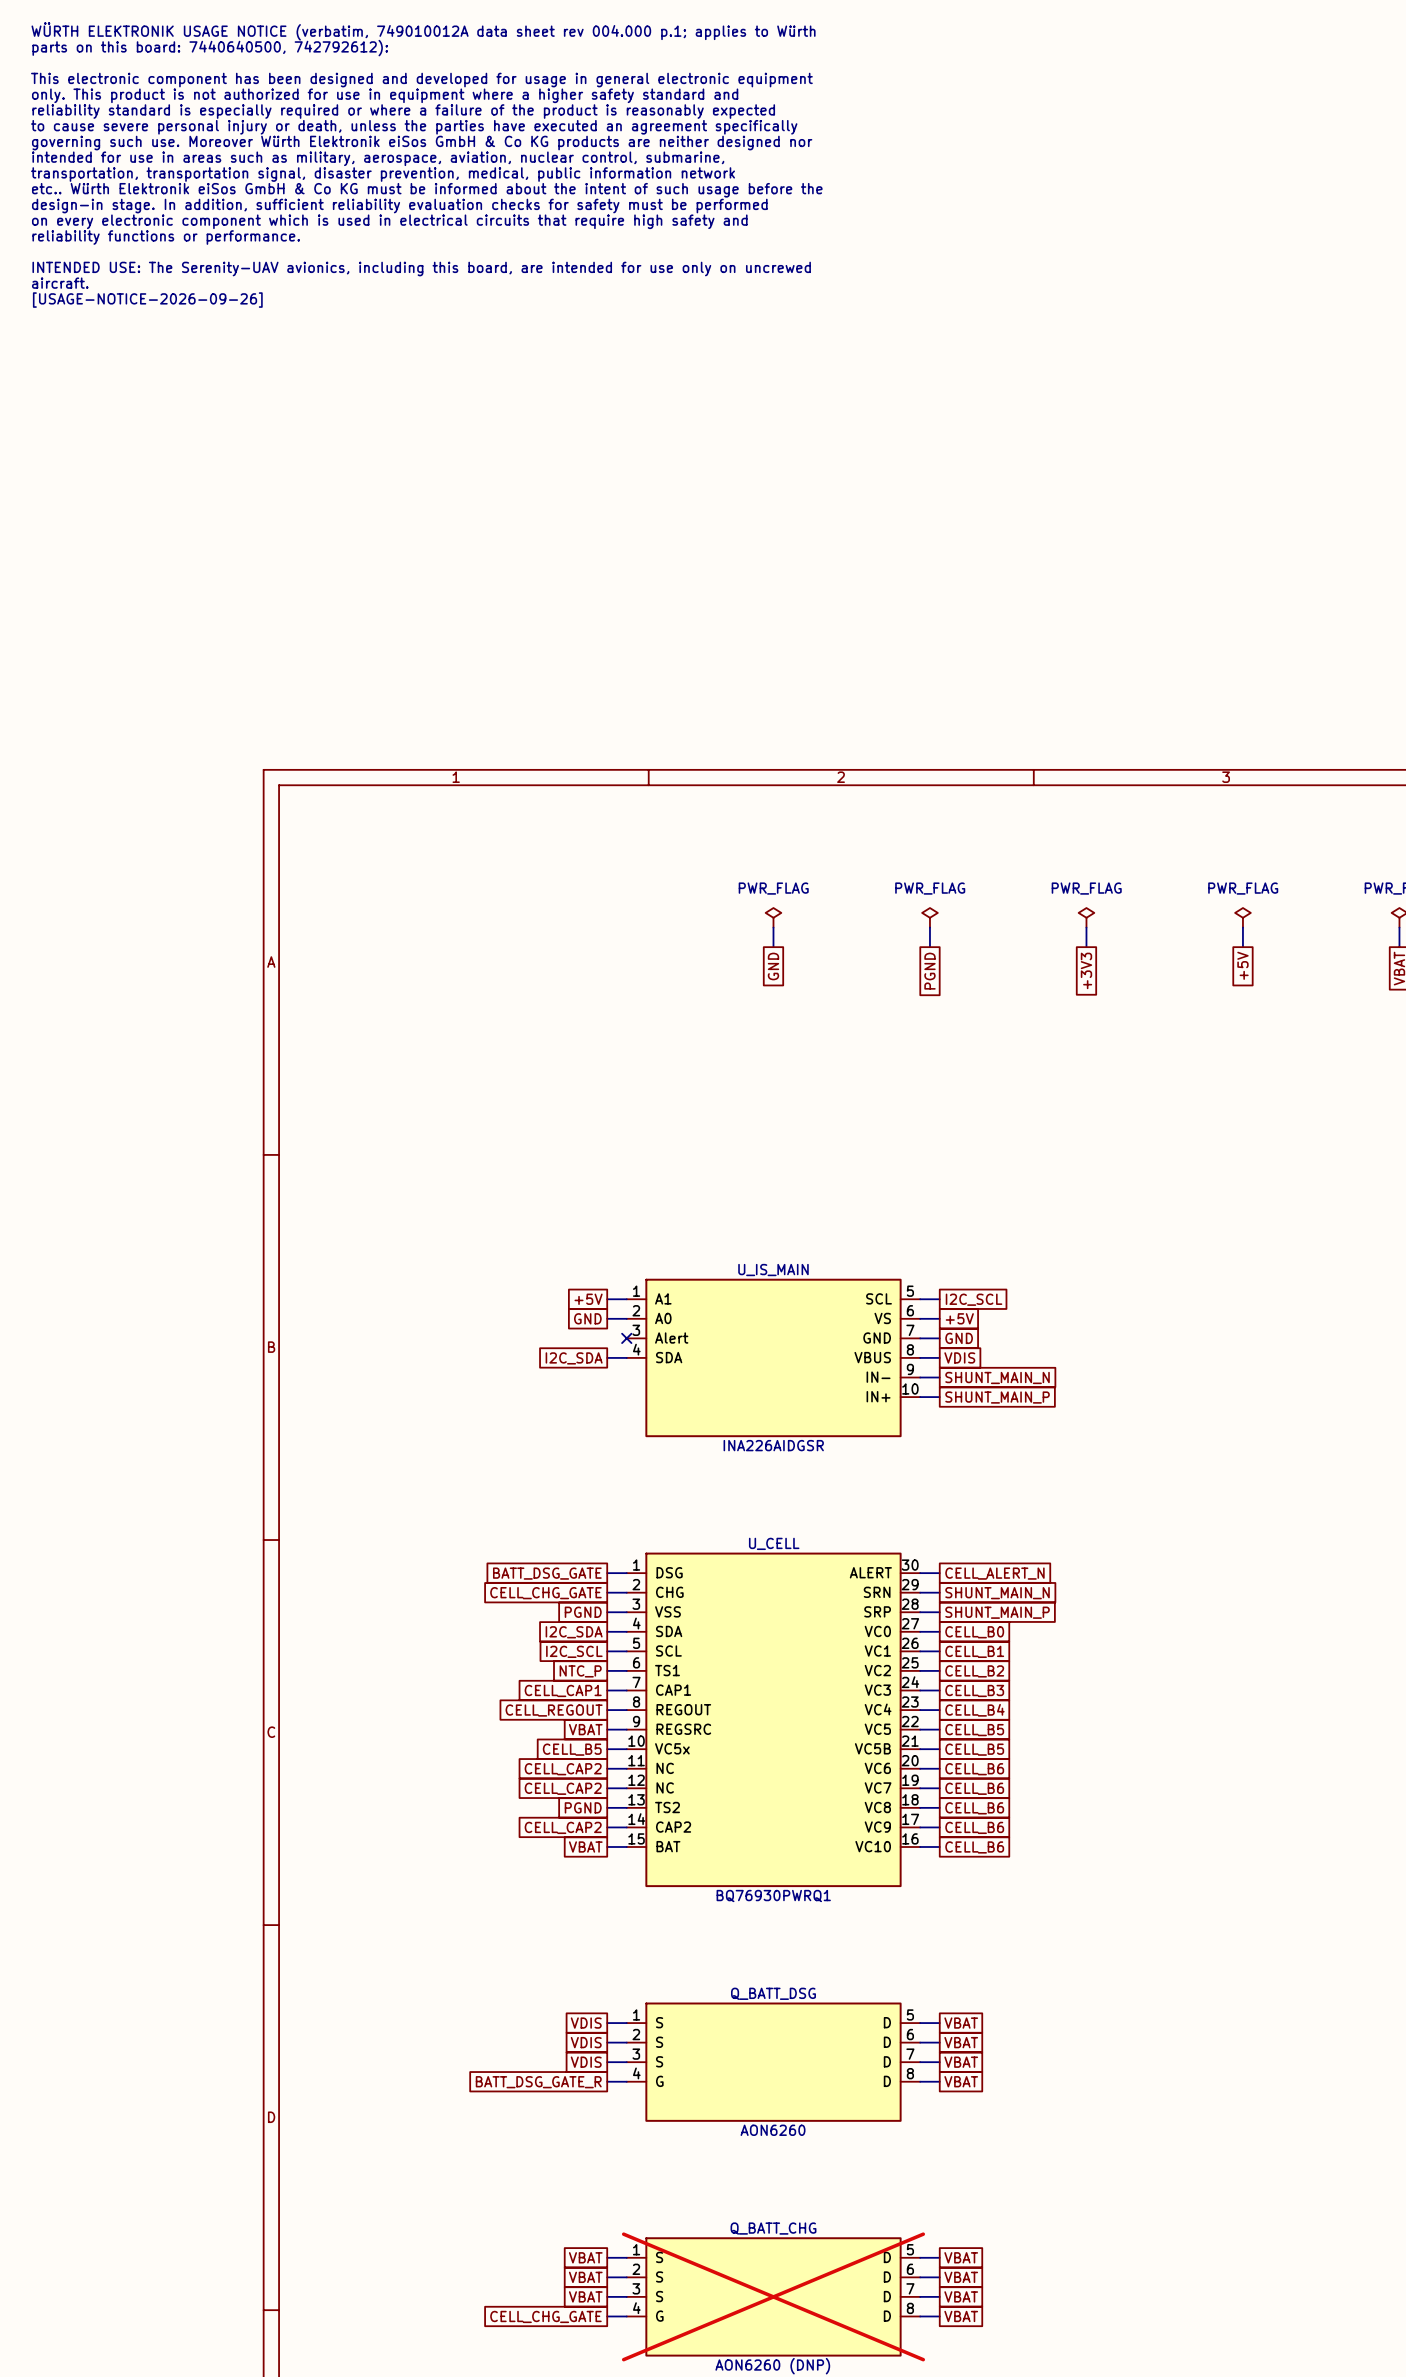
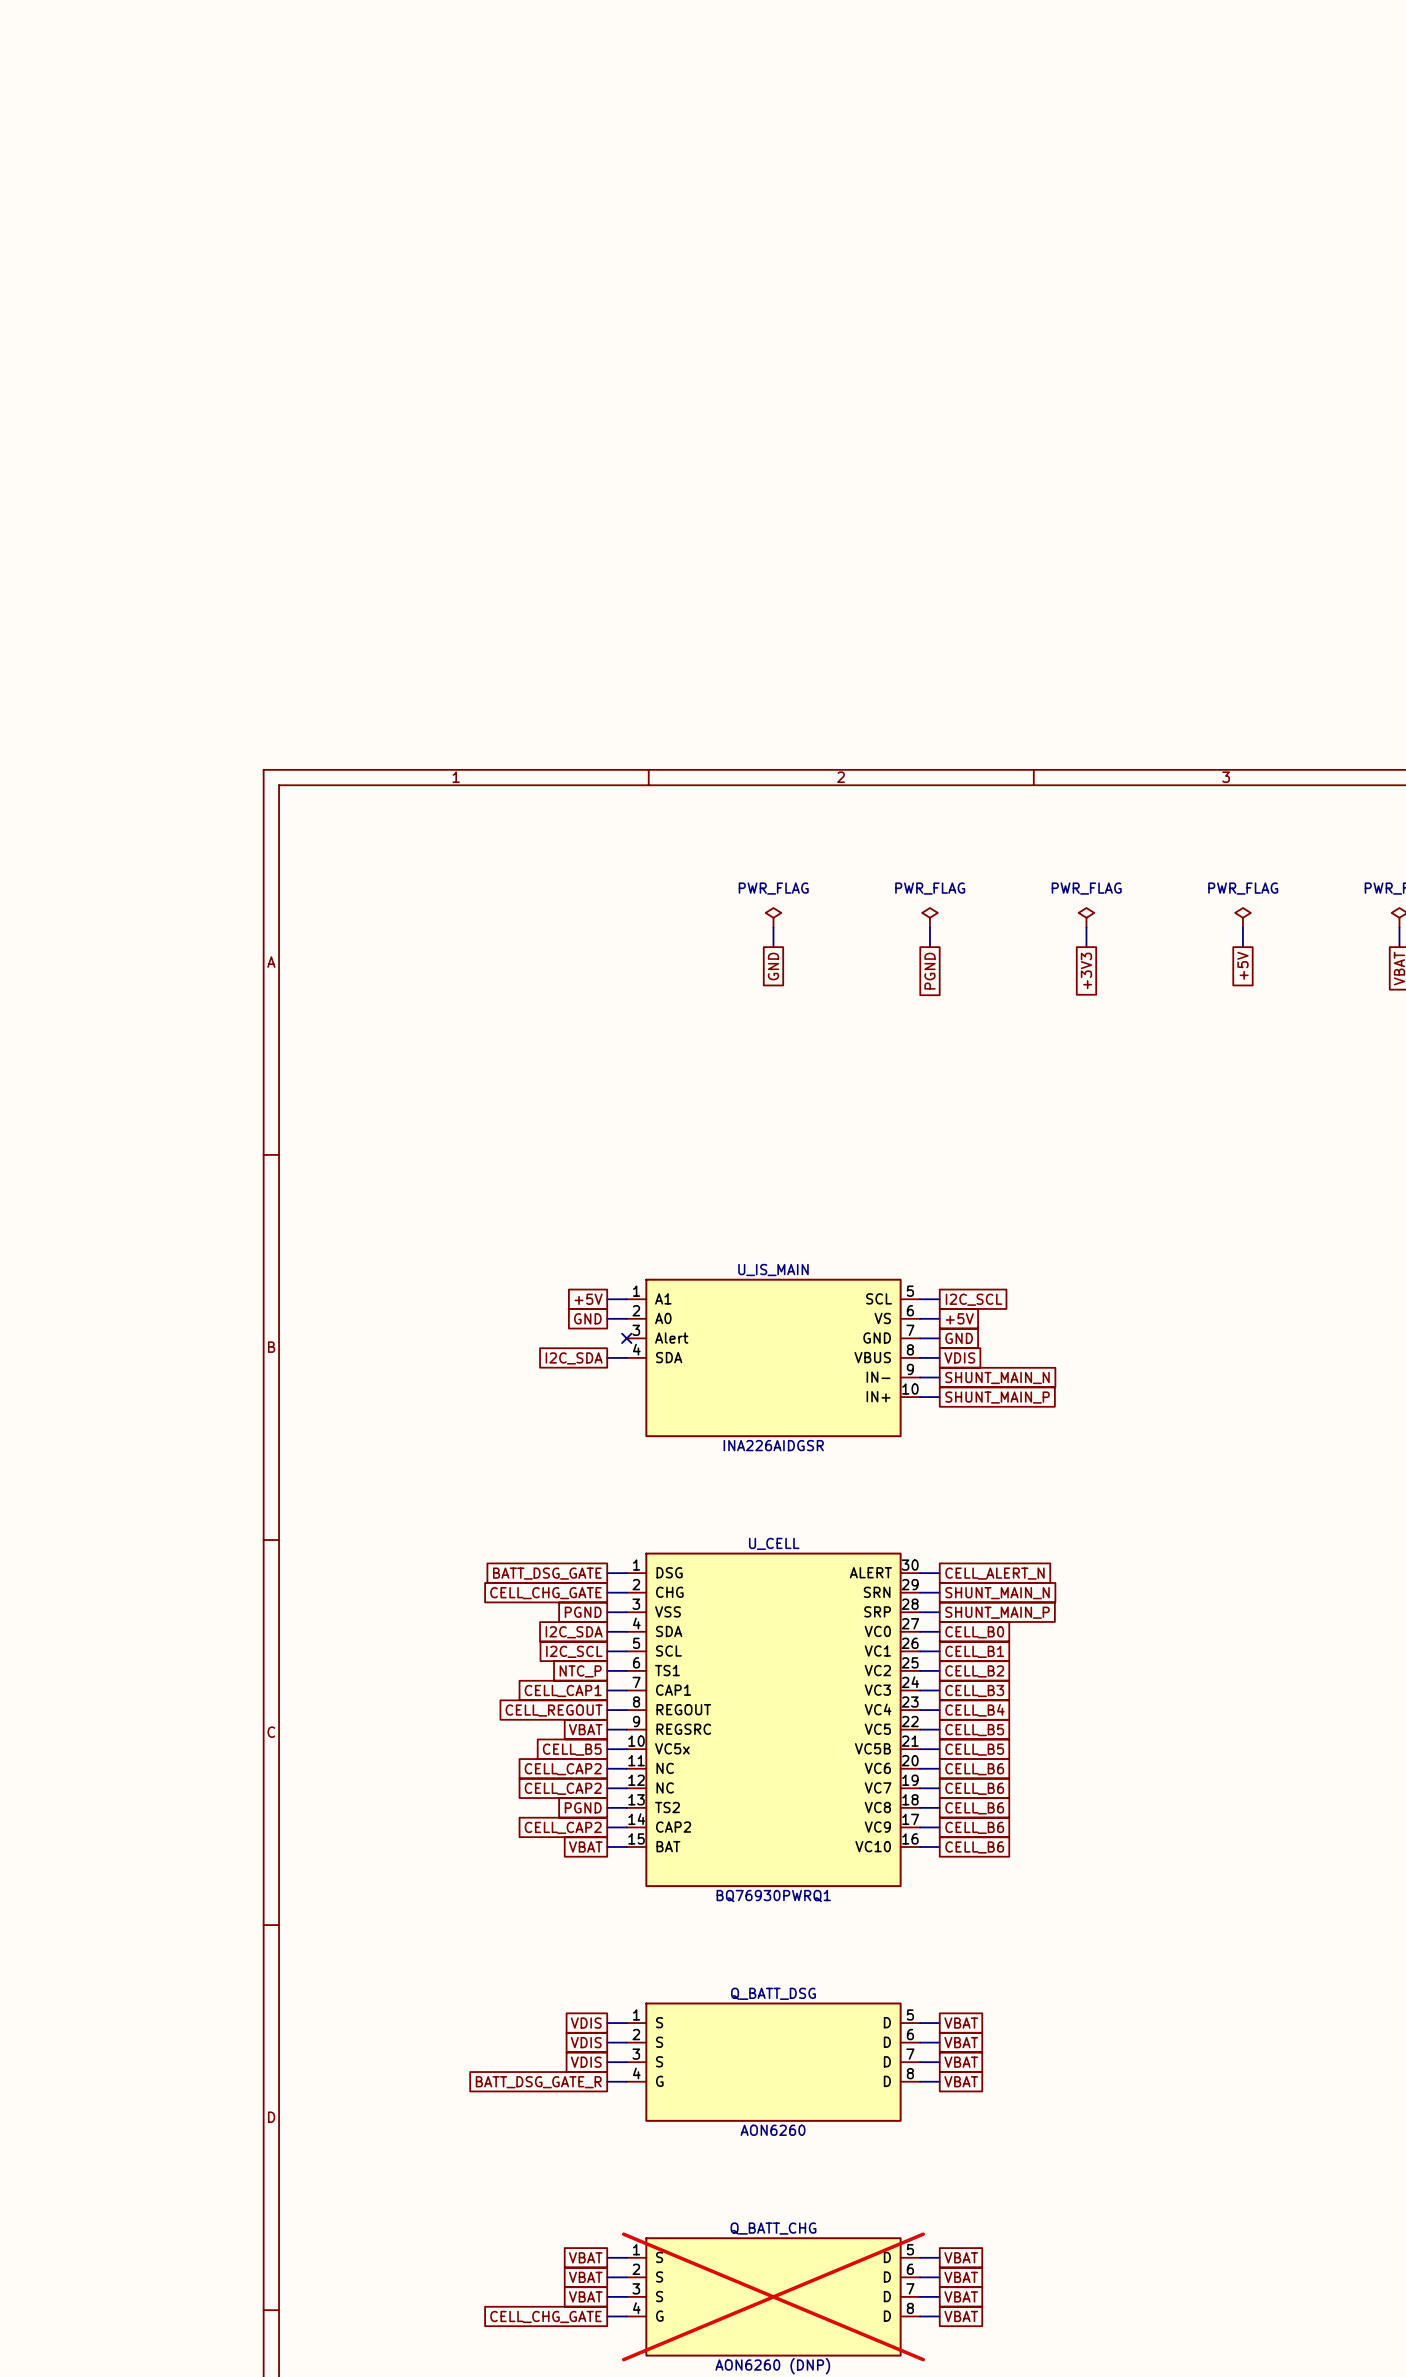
text: WÜRTH ELEKTRONIK USAGE NOTICE (verbatim, 749010012A data sheet rev 004.000 p.1; applies to Würth (423, 31) -> none
text: parts on this board: 7440640500, 742792612): (210, 48) -> none
text: This electronic component has been designed and developed for usage in general electronic equipment (421, 80) -> none
text: only. This product is not authorized for use in equipment where a higher safety standard and (385, 95) -> none
text: reliability standard is especially required or where a failure of the product is reasonably expected (403, 111) -> none
text: to cause severe personal injury or death, unless the parties have executed an agreement specifically (414, 127) -> none
text: governing such use. Moreover Würth Elektronik eiSos GmbH & Co KG products are neither designed nor (422, 143) -> none
text: intended for use in areas such as military, aerospace, aviation, nuclear control, submarine, (378, 158) -> none
text: transportation, transportation signal, disaster prevention, medical, public information network (383, 174) -> none
text: etc.. Würth Elektronik eiSos GmbH & Co KG must be informed about the intent of such usage before the (427, 190) -> none
text: design-in stage. In addition, sufficient reliability evaluation checks for safety must be performed (399, 206) -> none
text: on every electronic component which is used in electrical circuits that require high safety and (389, 221) -> none
text: reliability functions or performance. (166, 237) -> none
text: INTENDED USE: The Serenity-UAV avionics, including this board, are intended for use only on uncrewed (421, 269) -> none
text: aircraft. (60, 283) -> none
text: [USAGE-NOTICE-2026-09-26] (147, 300) -> none

